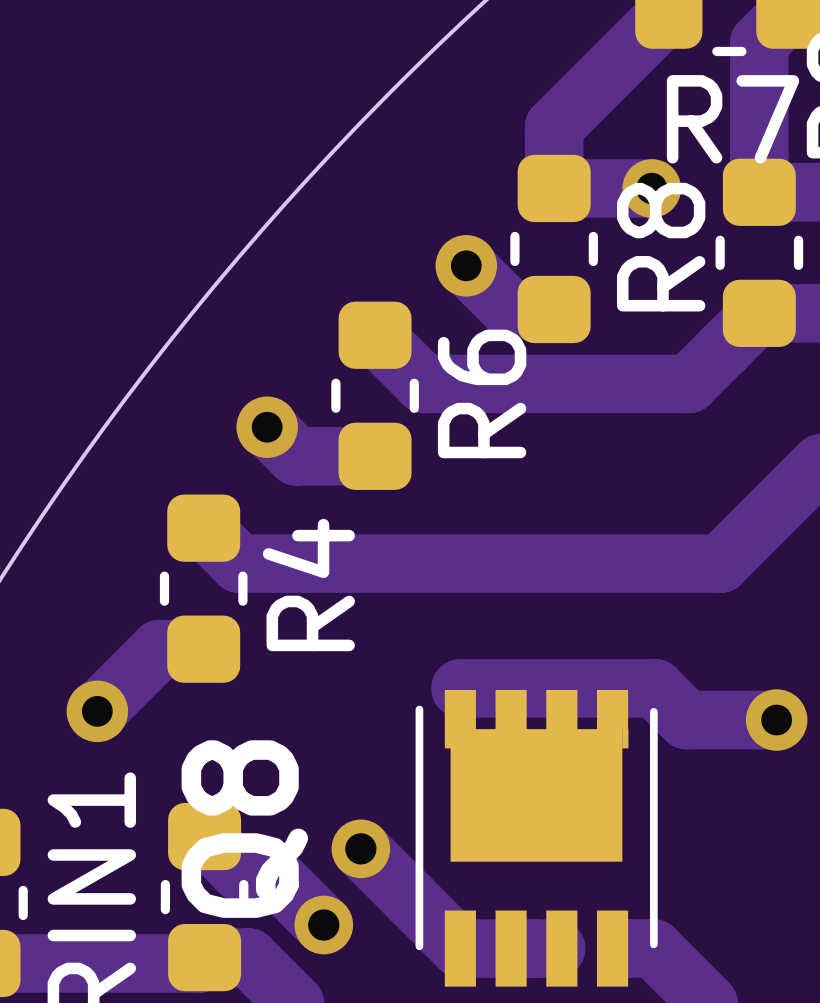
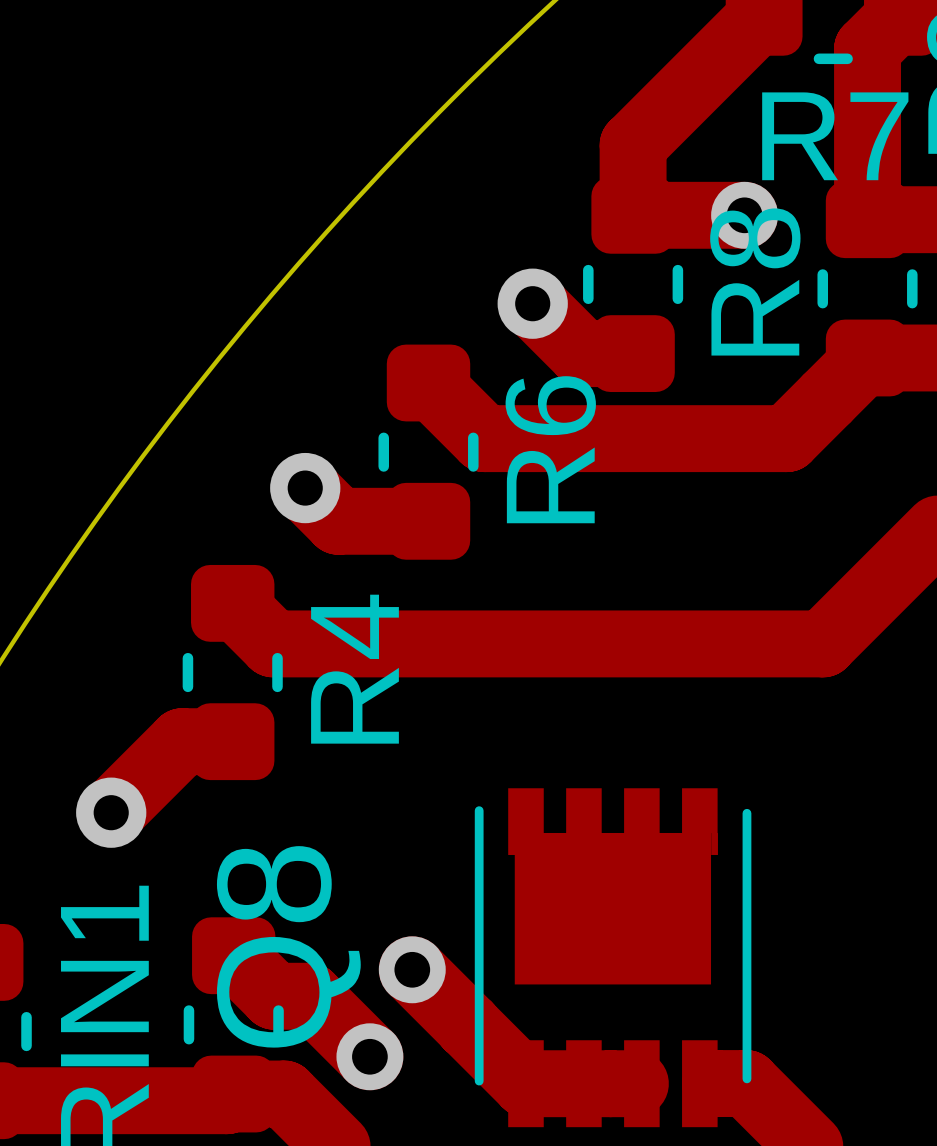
track: (460, 688) (655, 688) (686, 720) (776, 720) -> none
via: (776, 720) -> none

